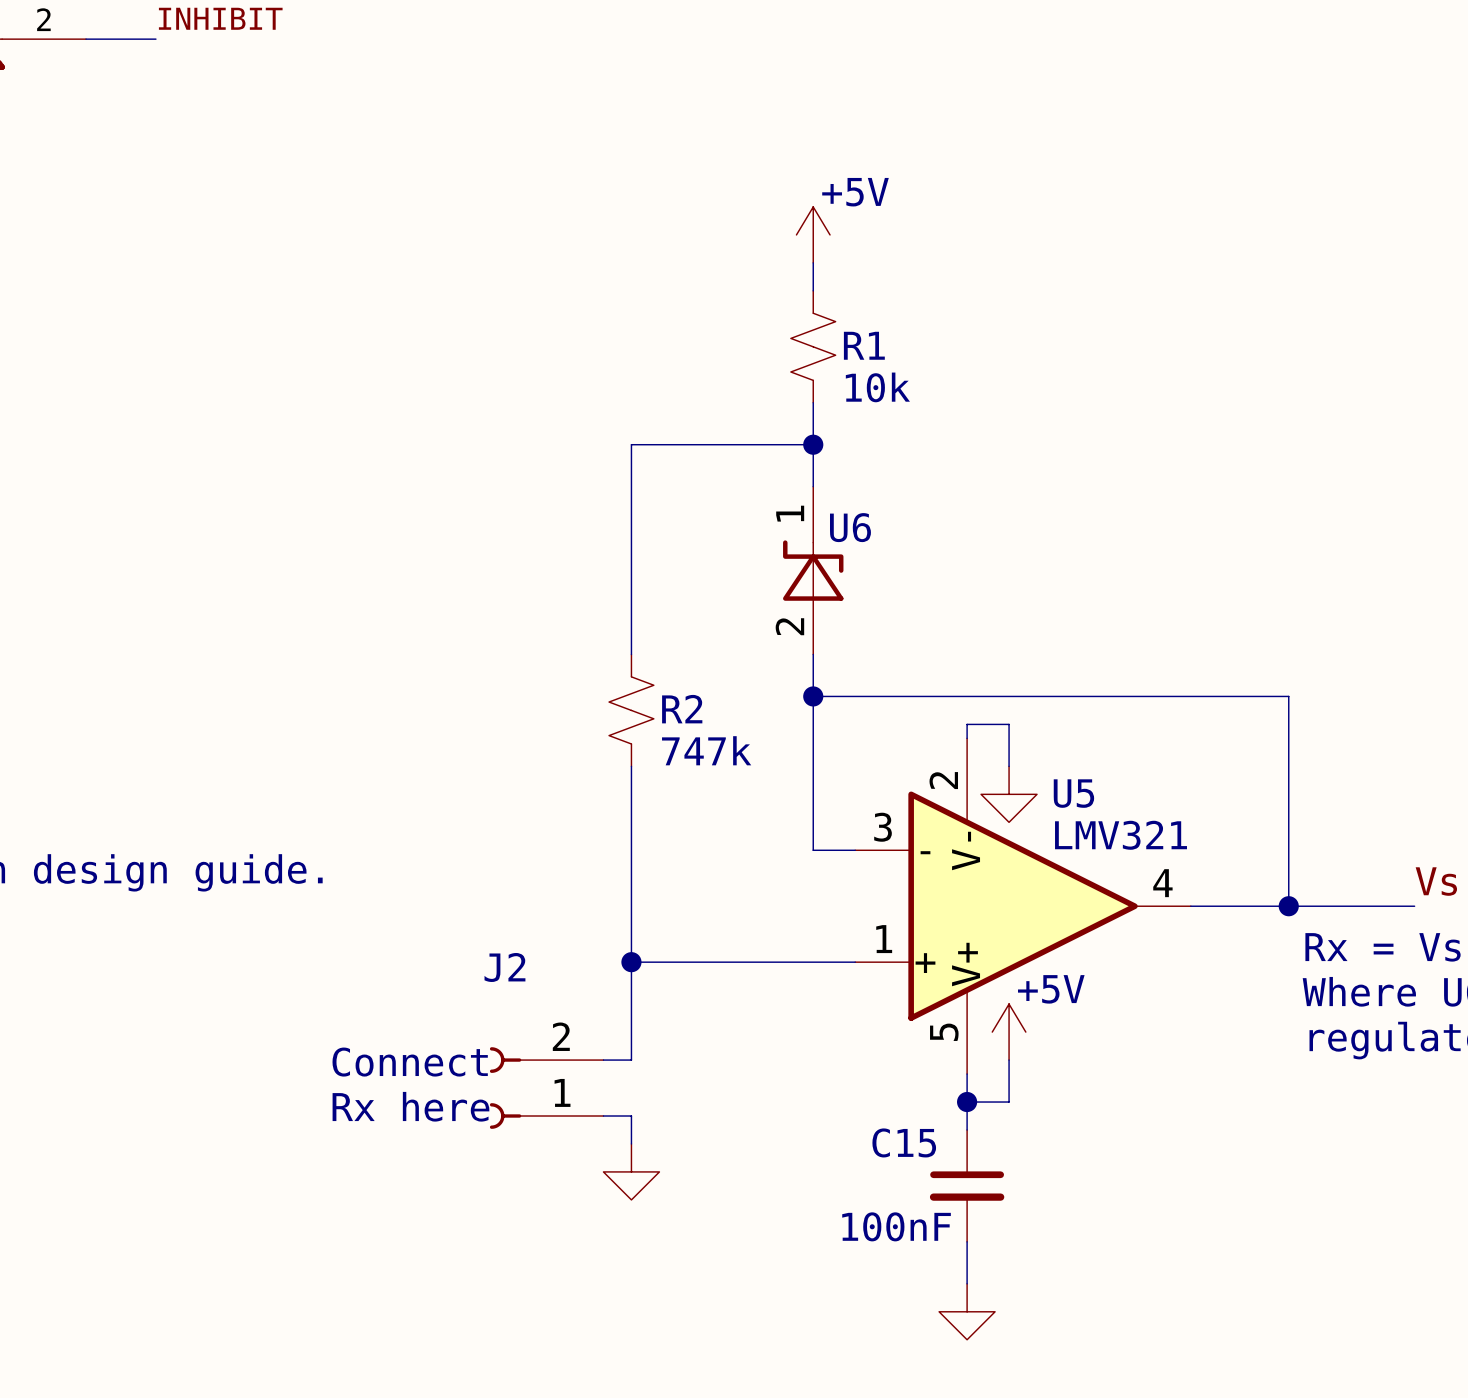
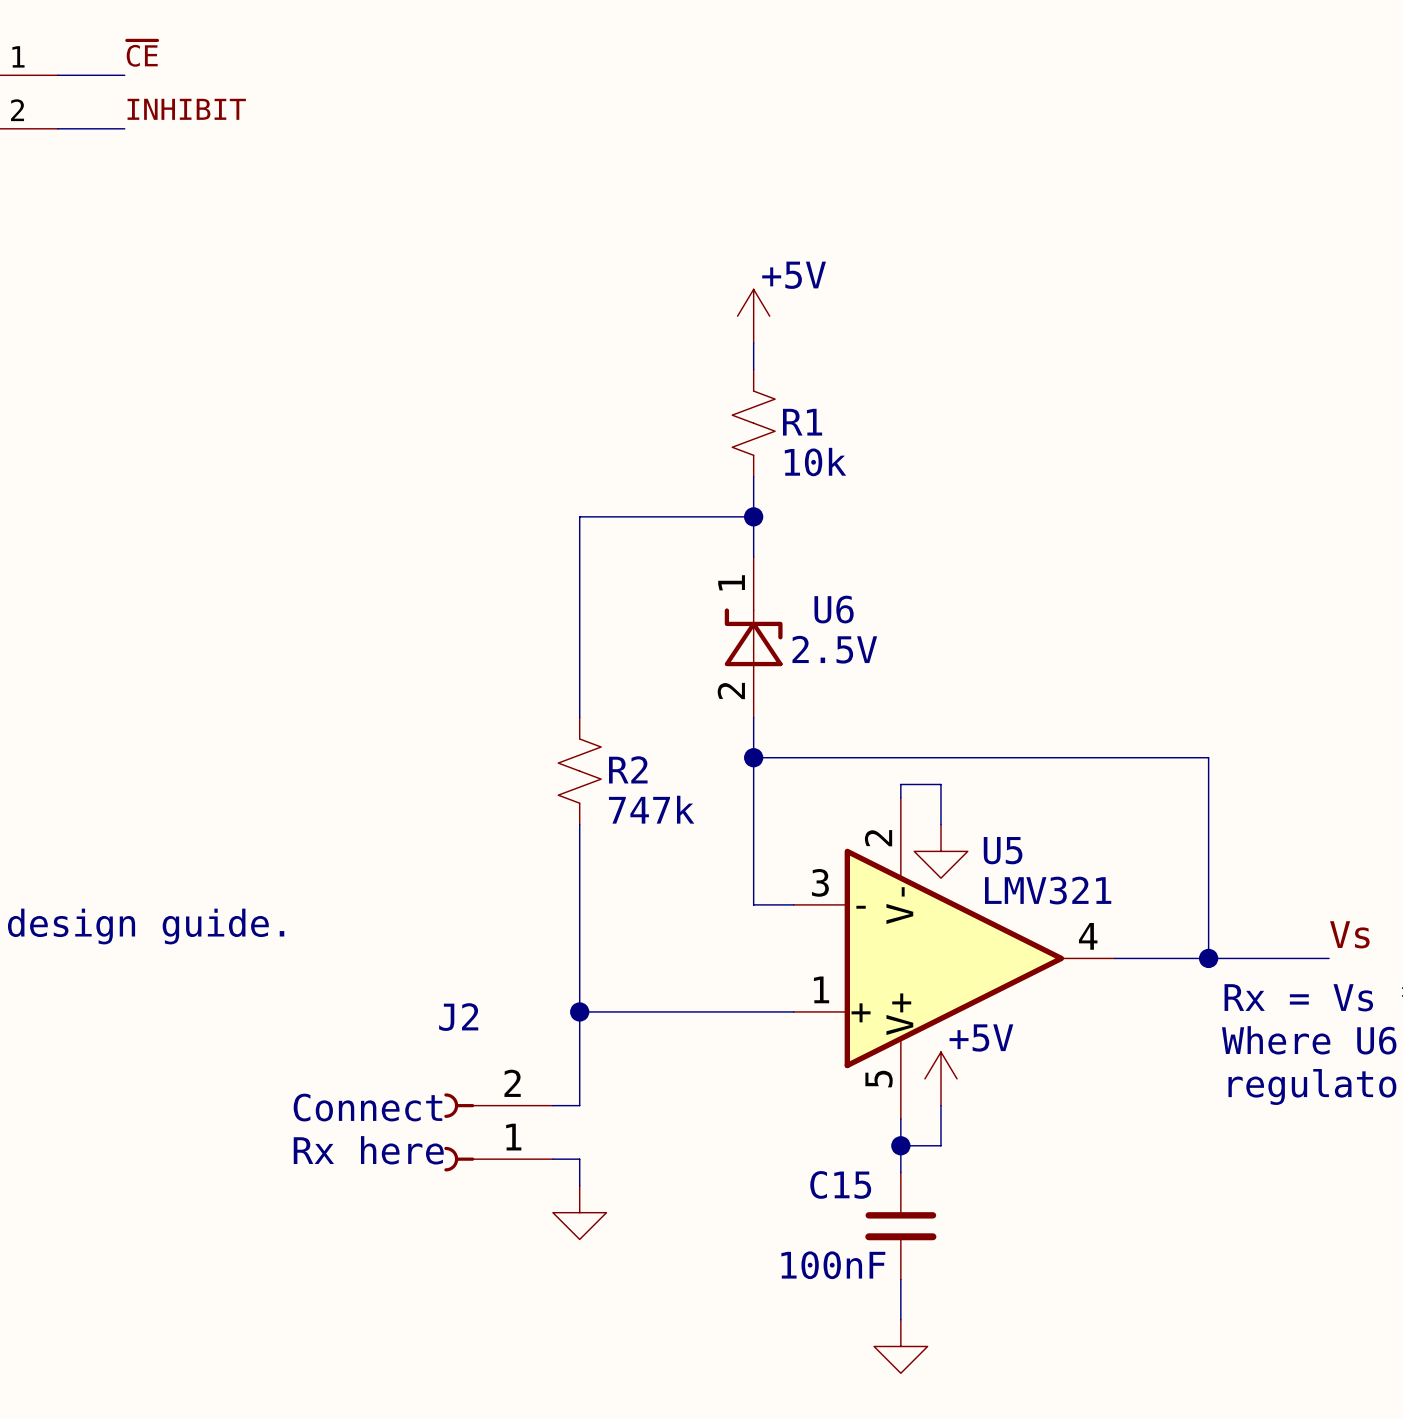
U6 name position: U6 (850, 527) -> U6 (834, 609)
U6 text: none -> 2.5V (834, 649)

